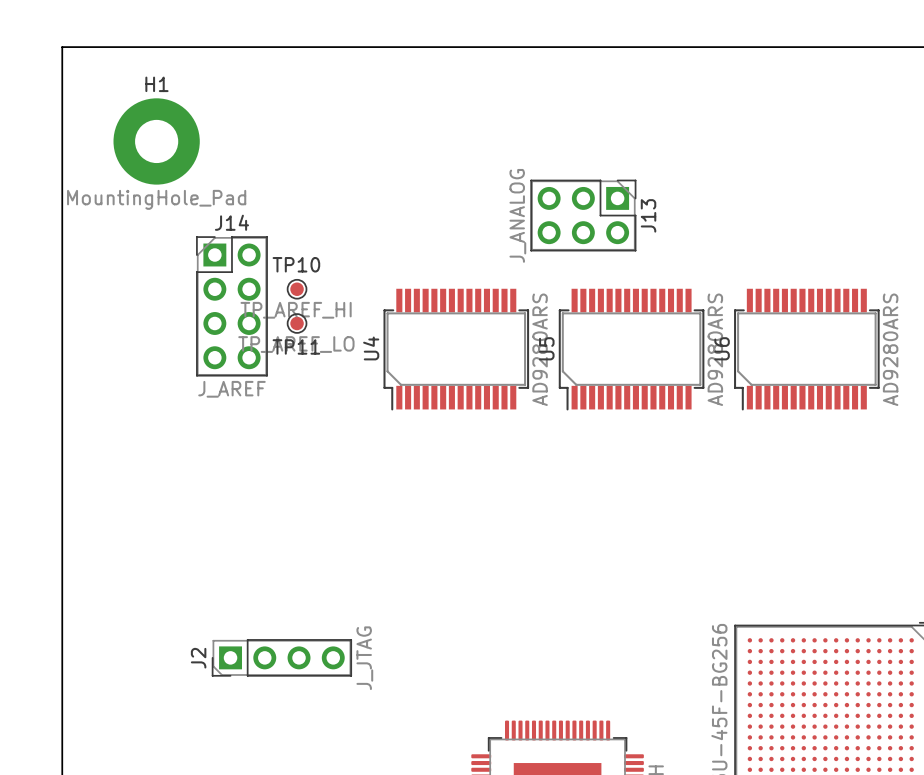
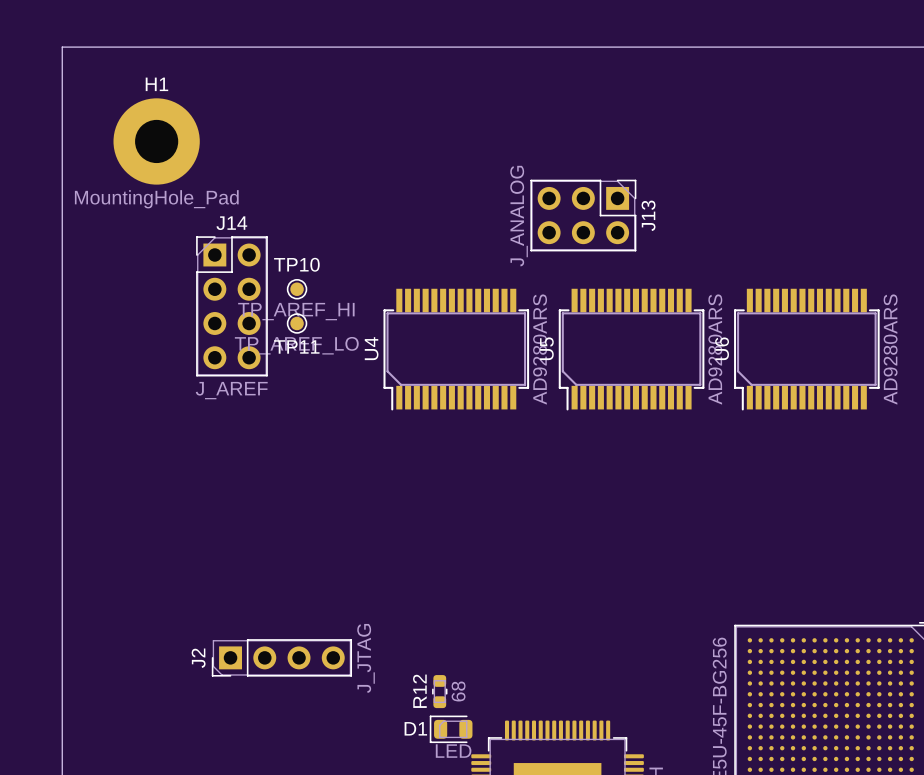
R12: none -> 68 (439, 691)
D1: none -> LED (451, 729)

